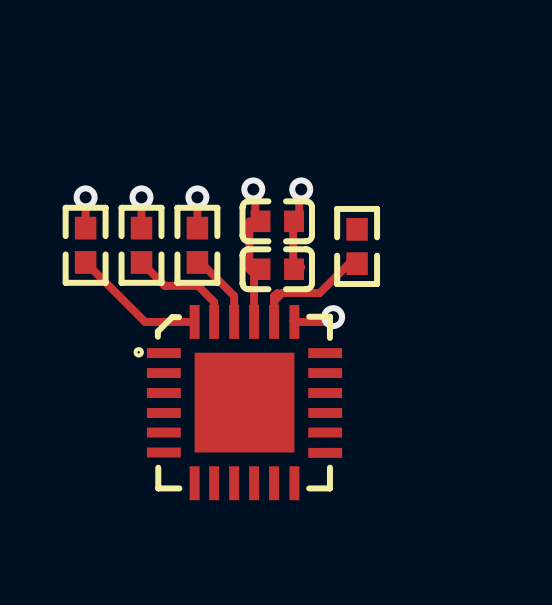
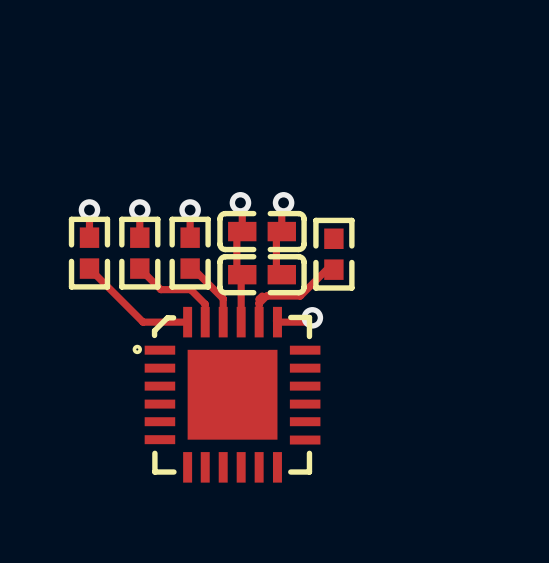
part footprint: [239, 198, 315, 245] -> [217, 210, 307, 253]
part footprint: [239, 246, 315, 293] -> [217, 254, 307, 296]

